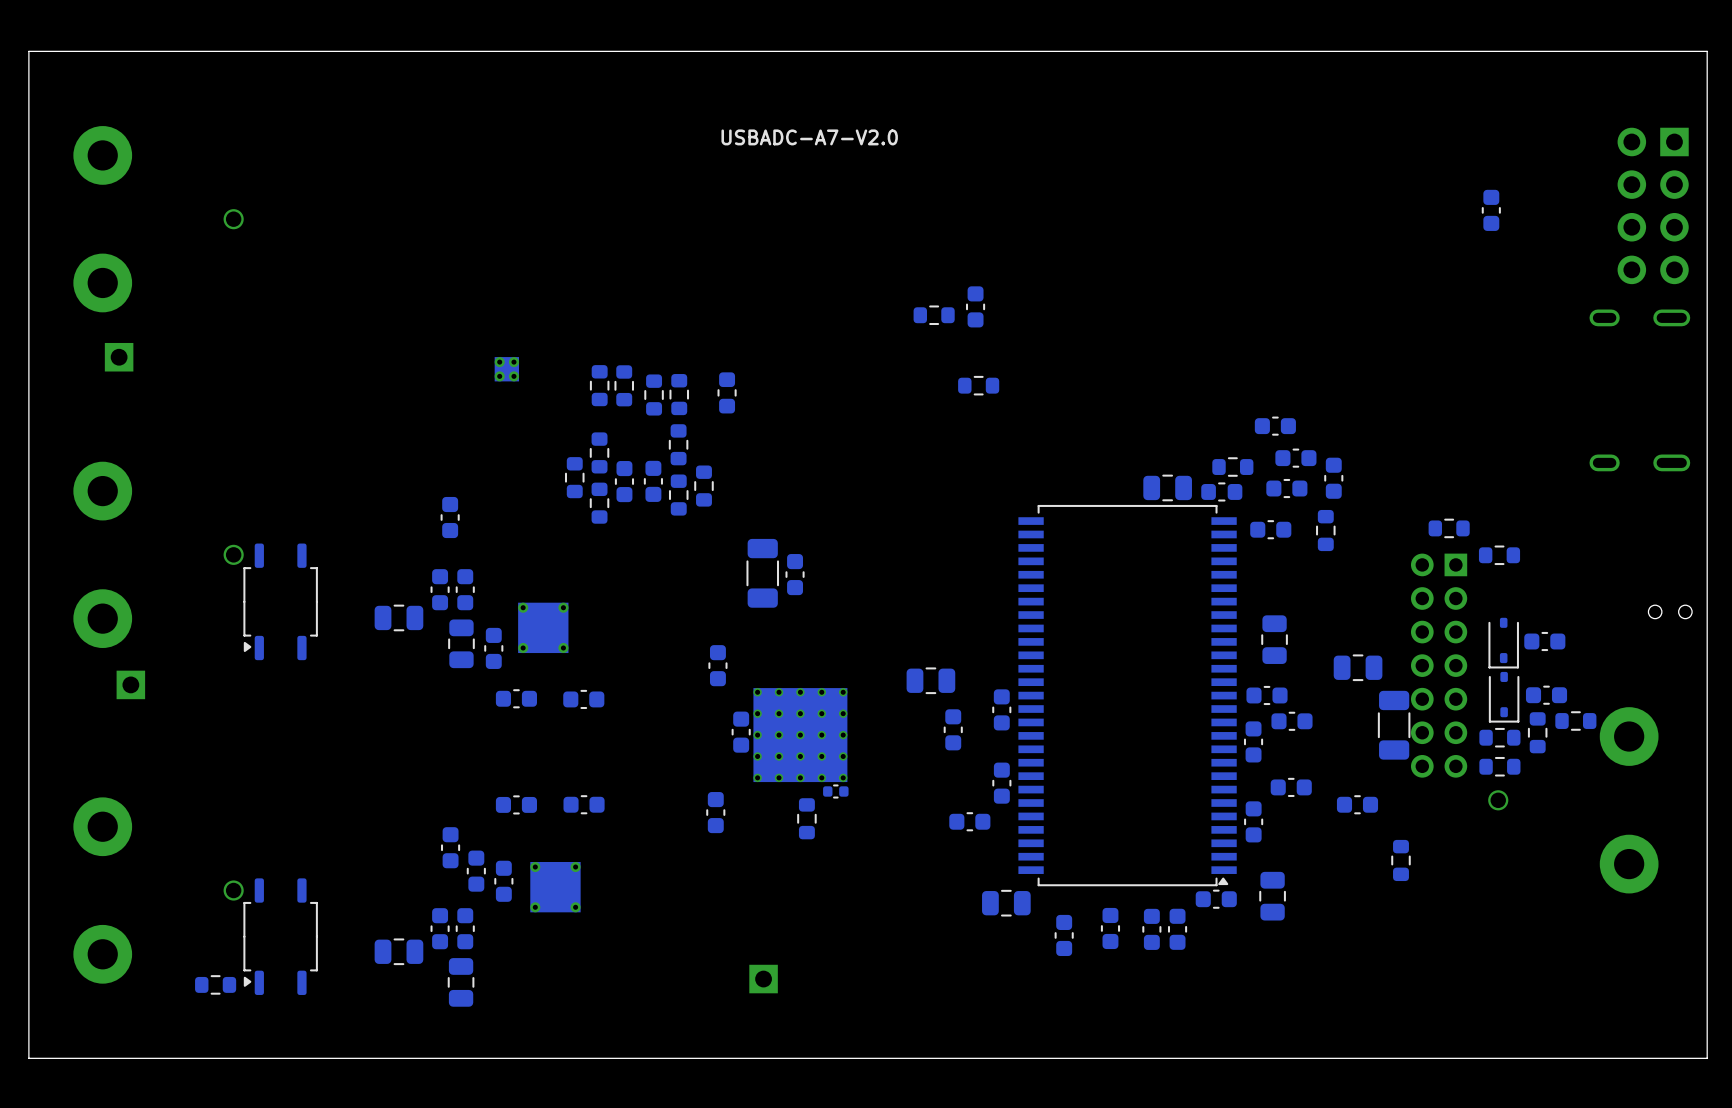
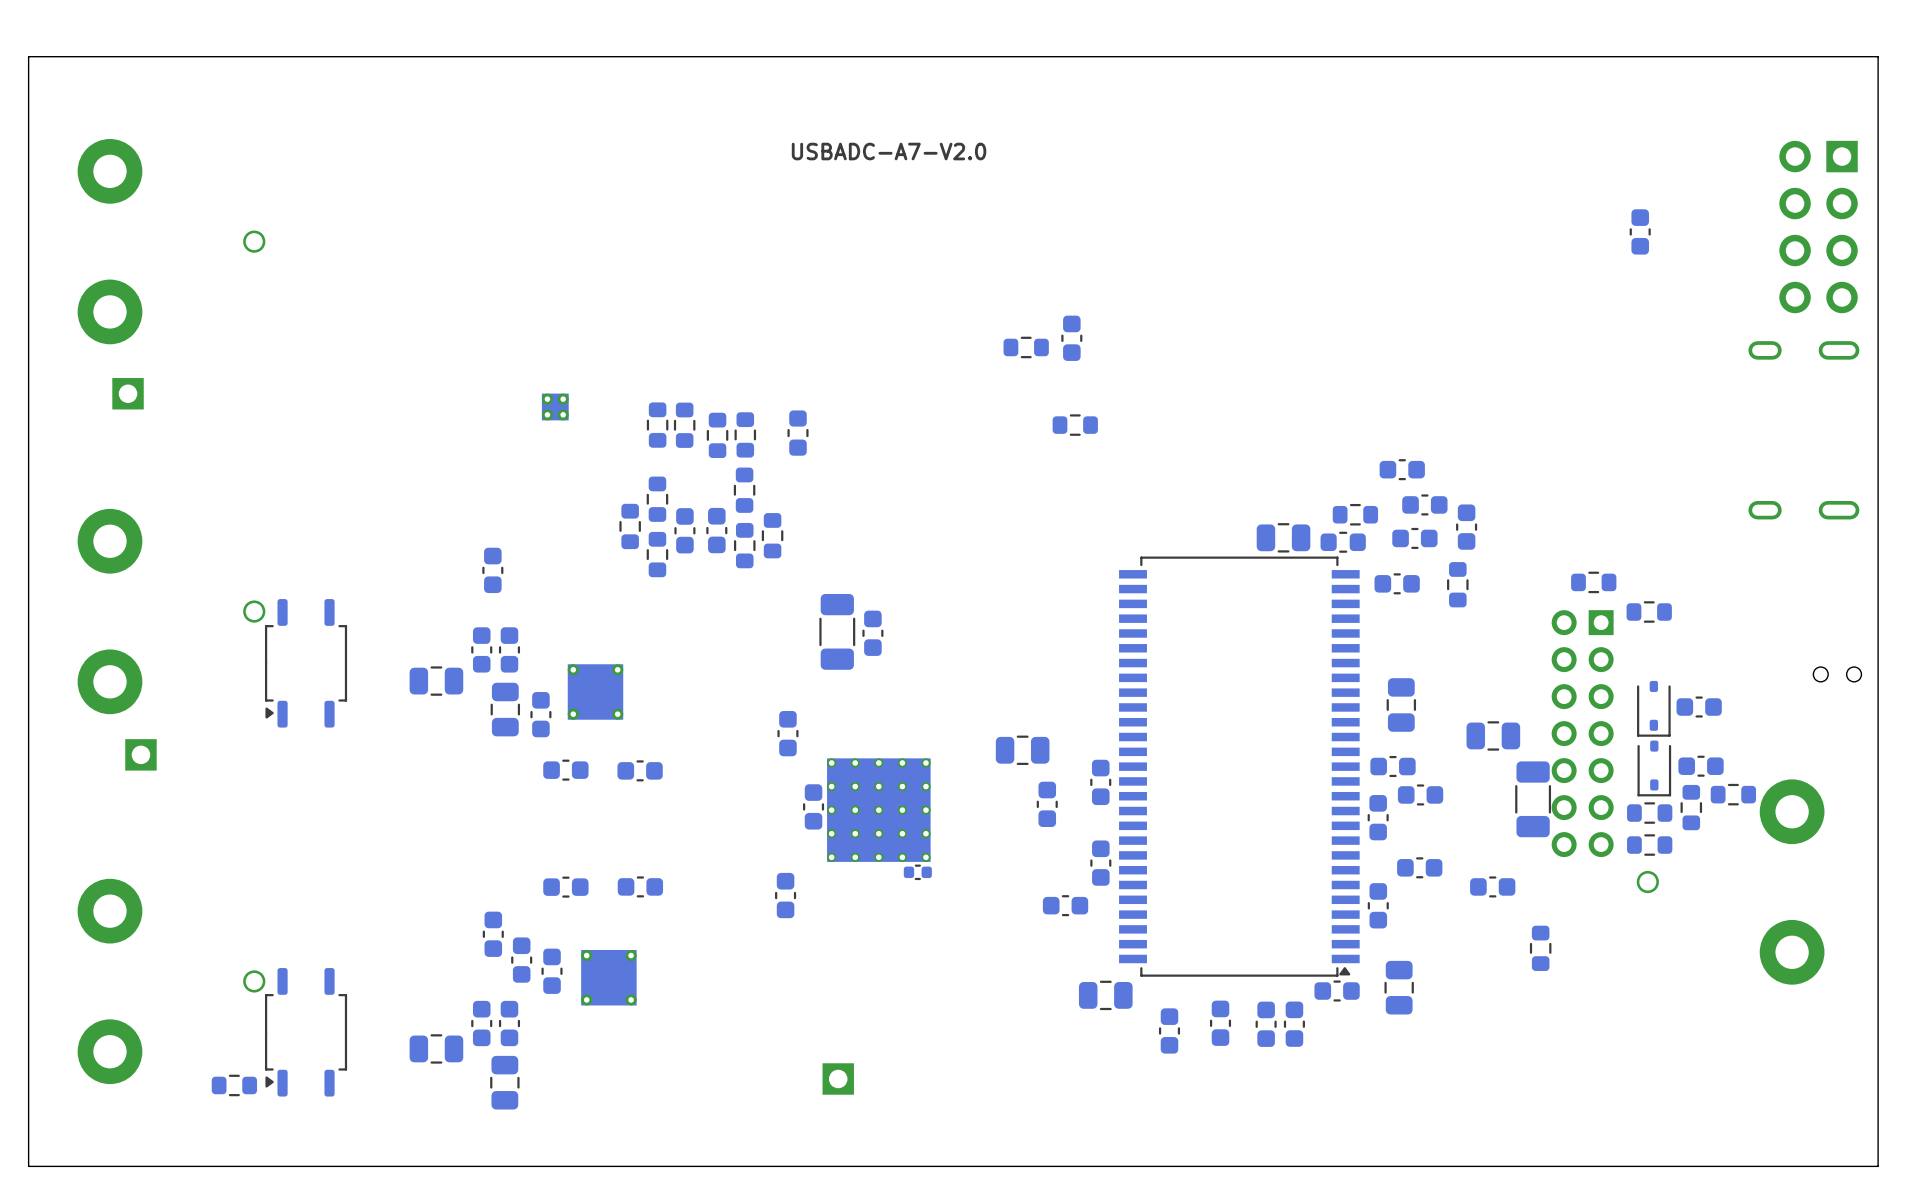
part: (806, 818) -> none

